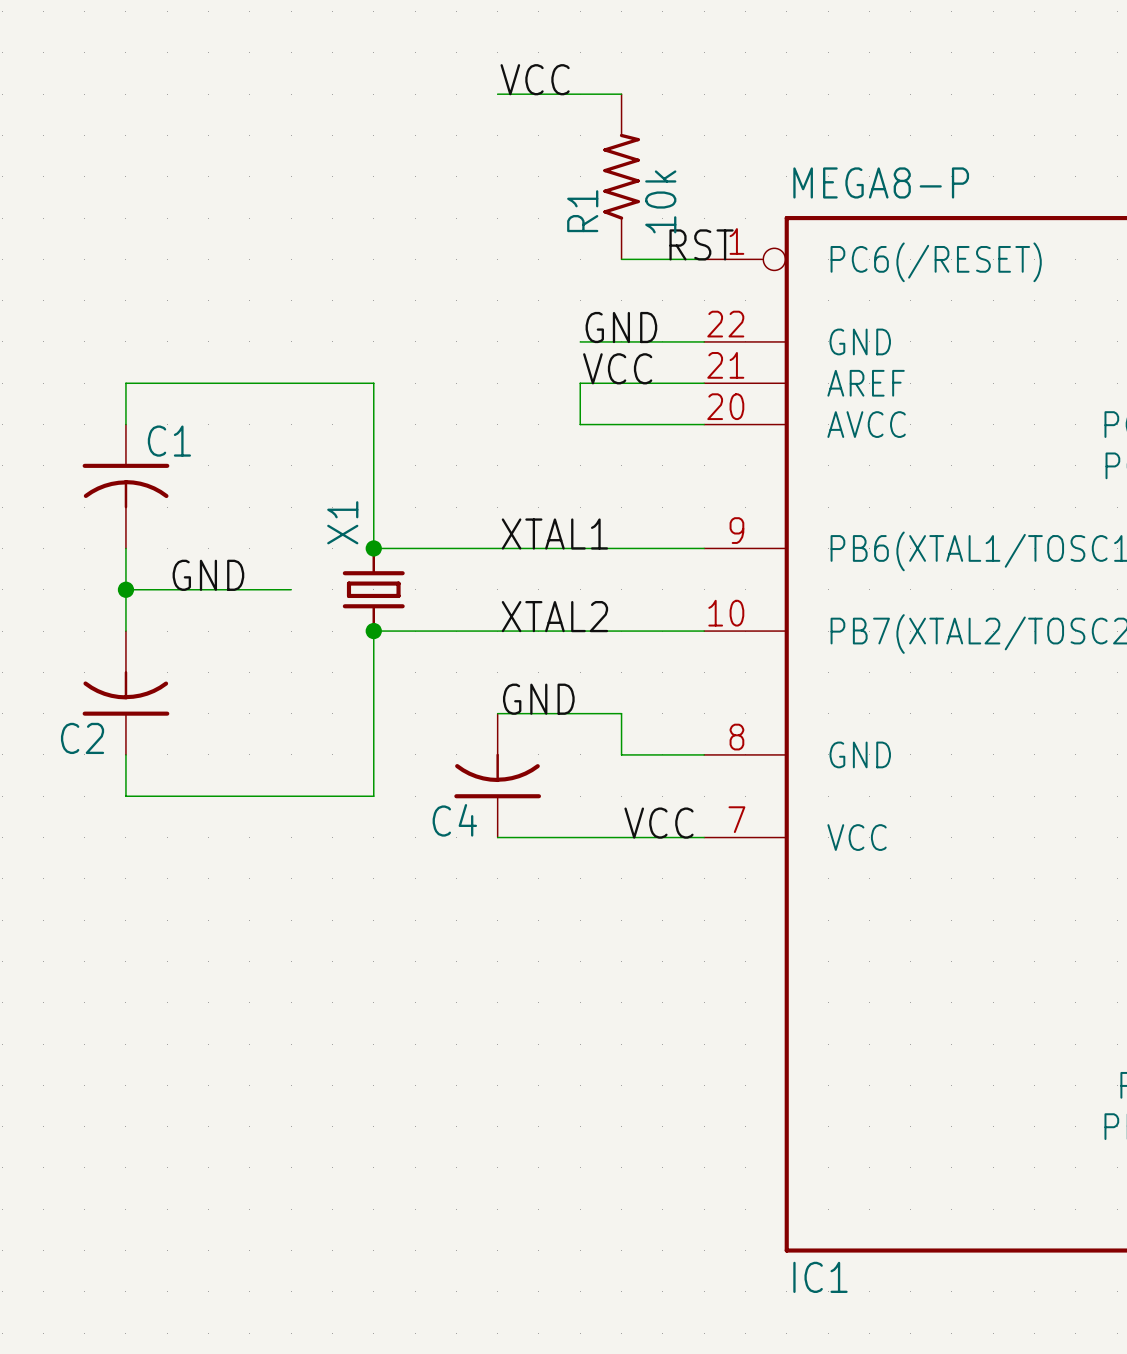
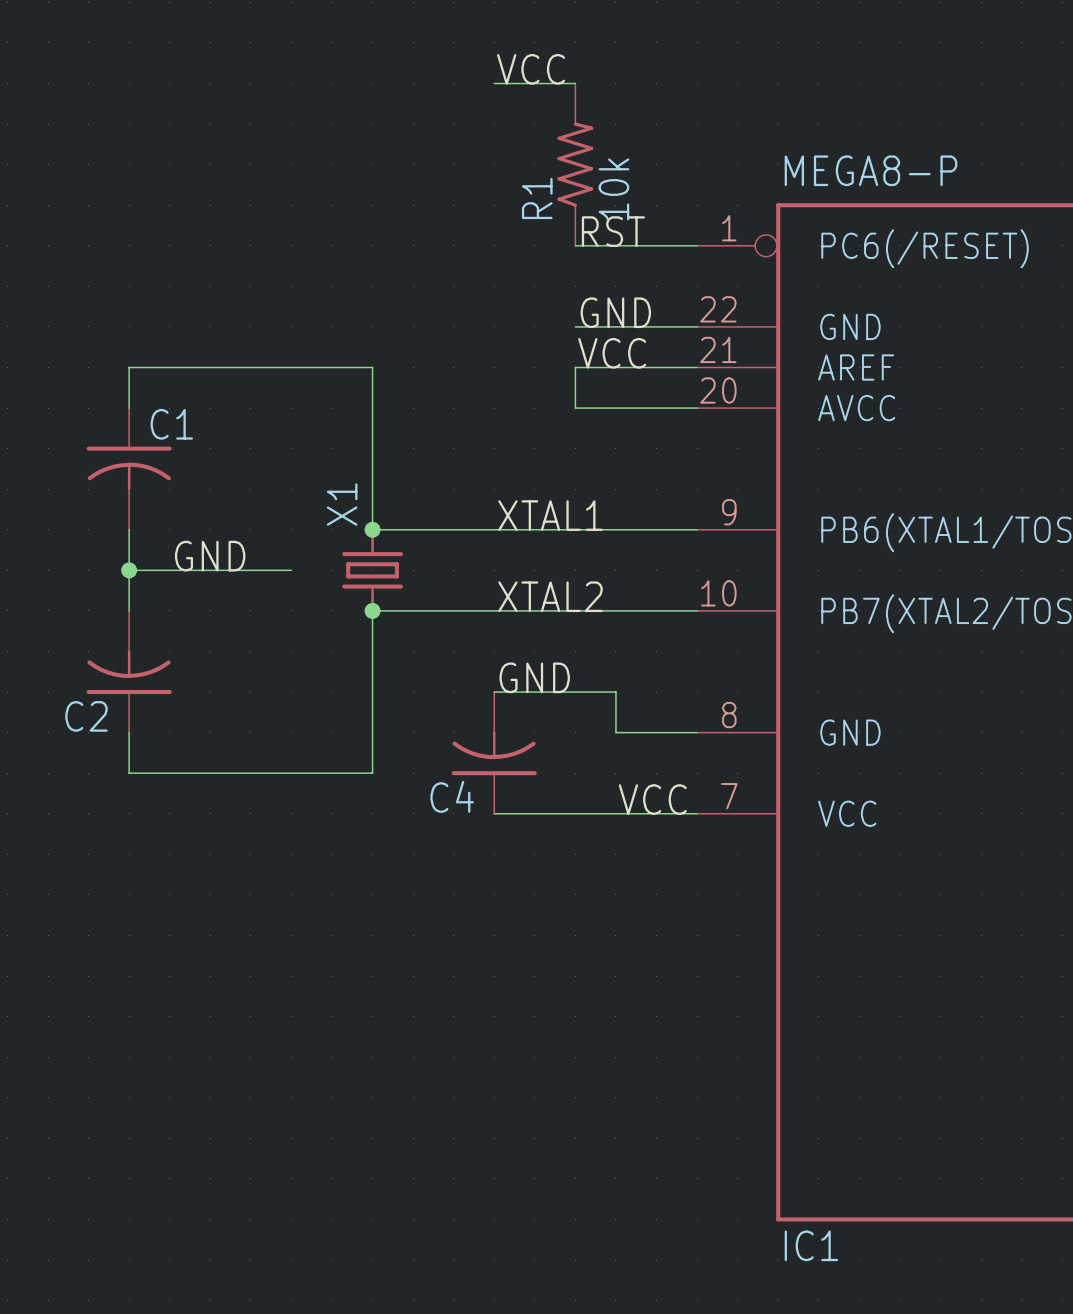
wire: (580, 94) (621, 94) -> (575, 245) (615, 245)
R1 position: (621, 176) -> (575, 164)
label position: RST (701, 244) -> RST (613, 231)

